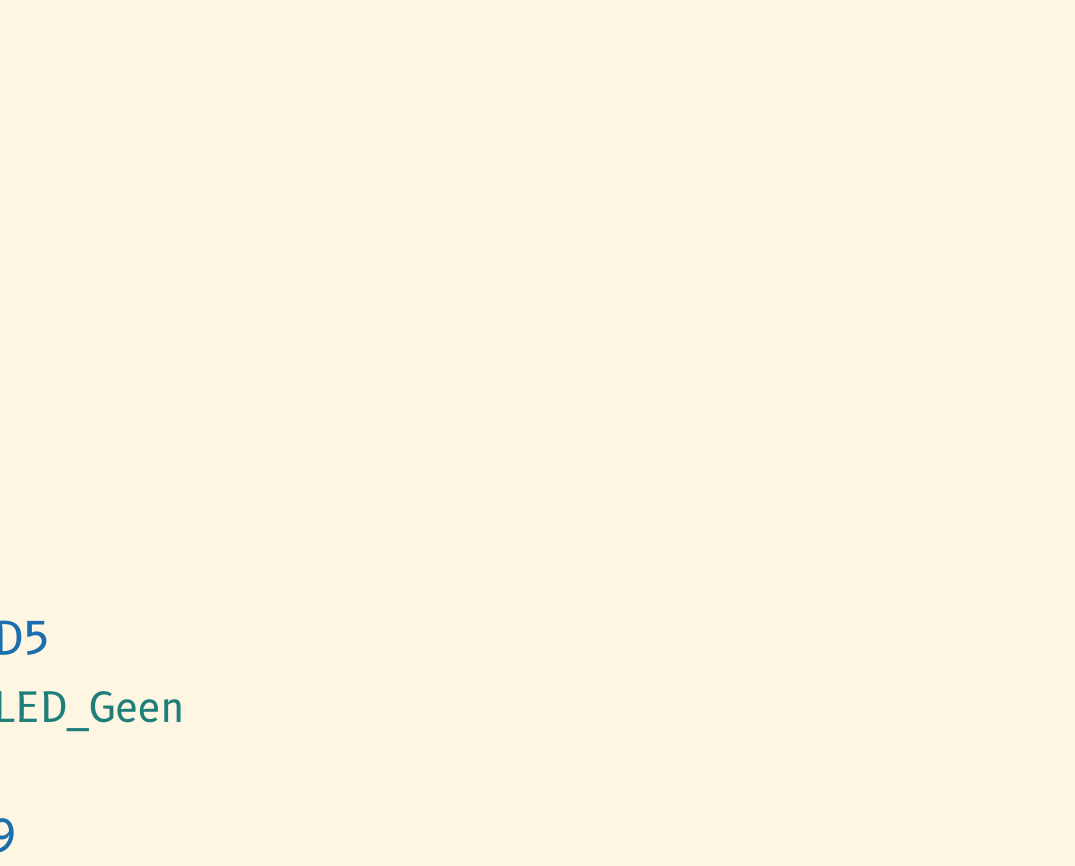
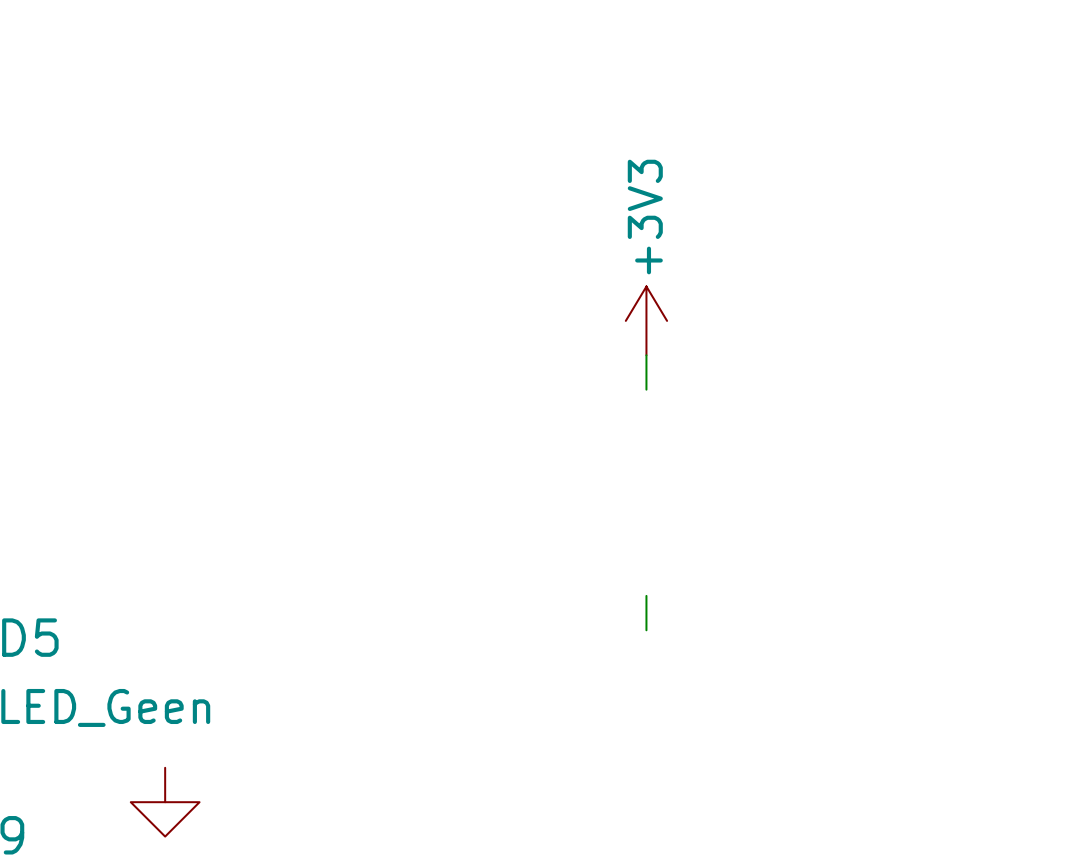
power symbol: none -> +3V3 (646, 320)
wire: none -> (646, 355) (646, 389)
wire: none -> (646, 595) (646, 630)
power symbol: none -> (165, 802)

